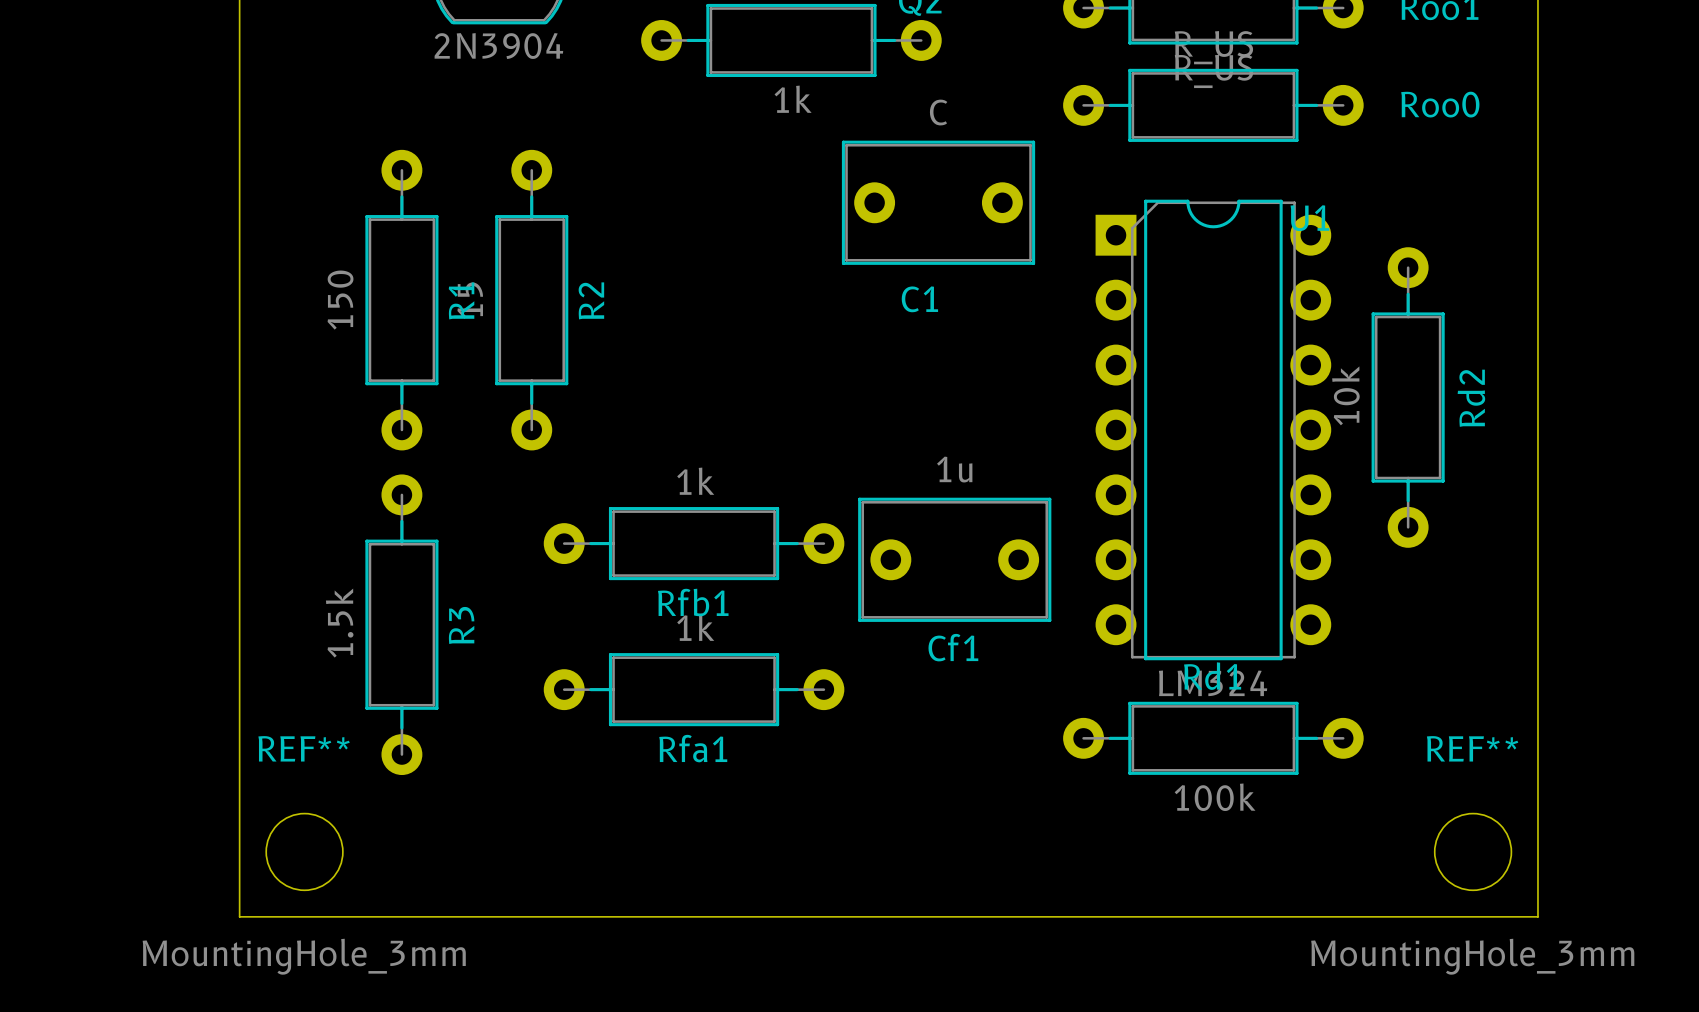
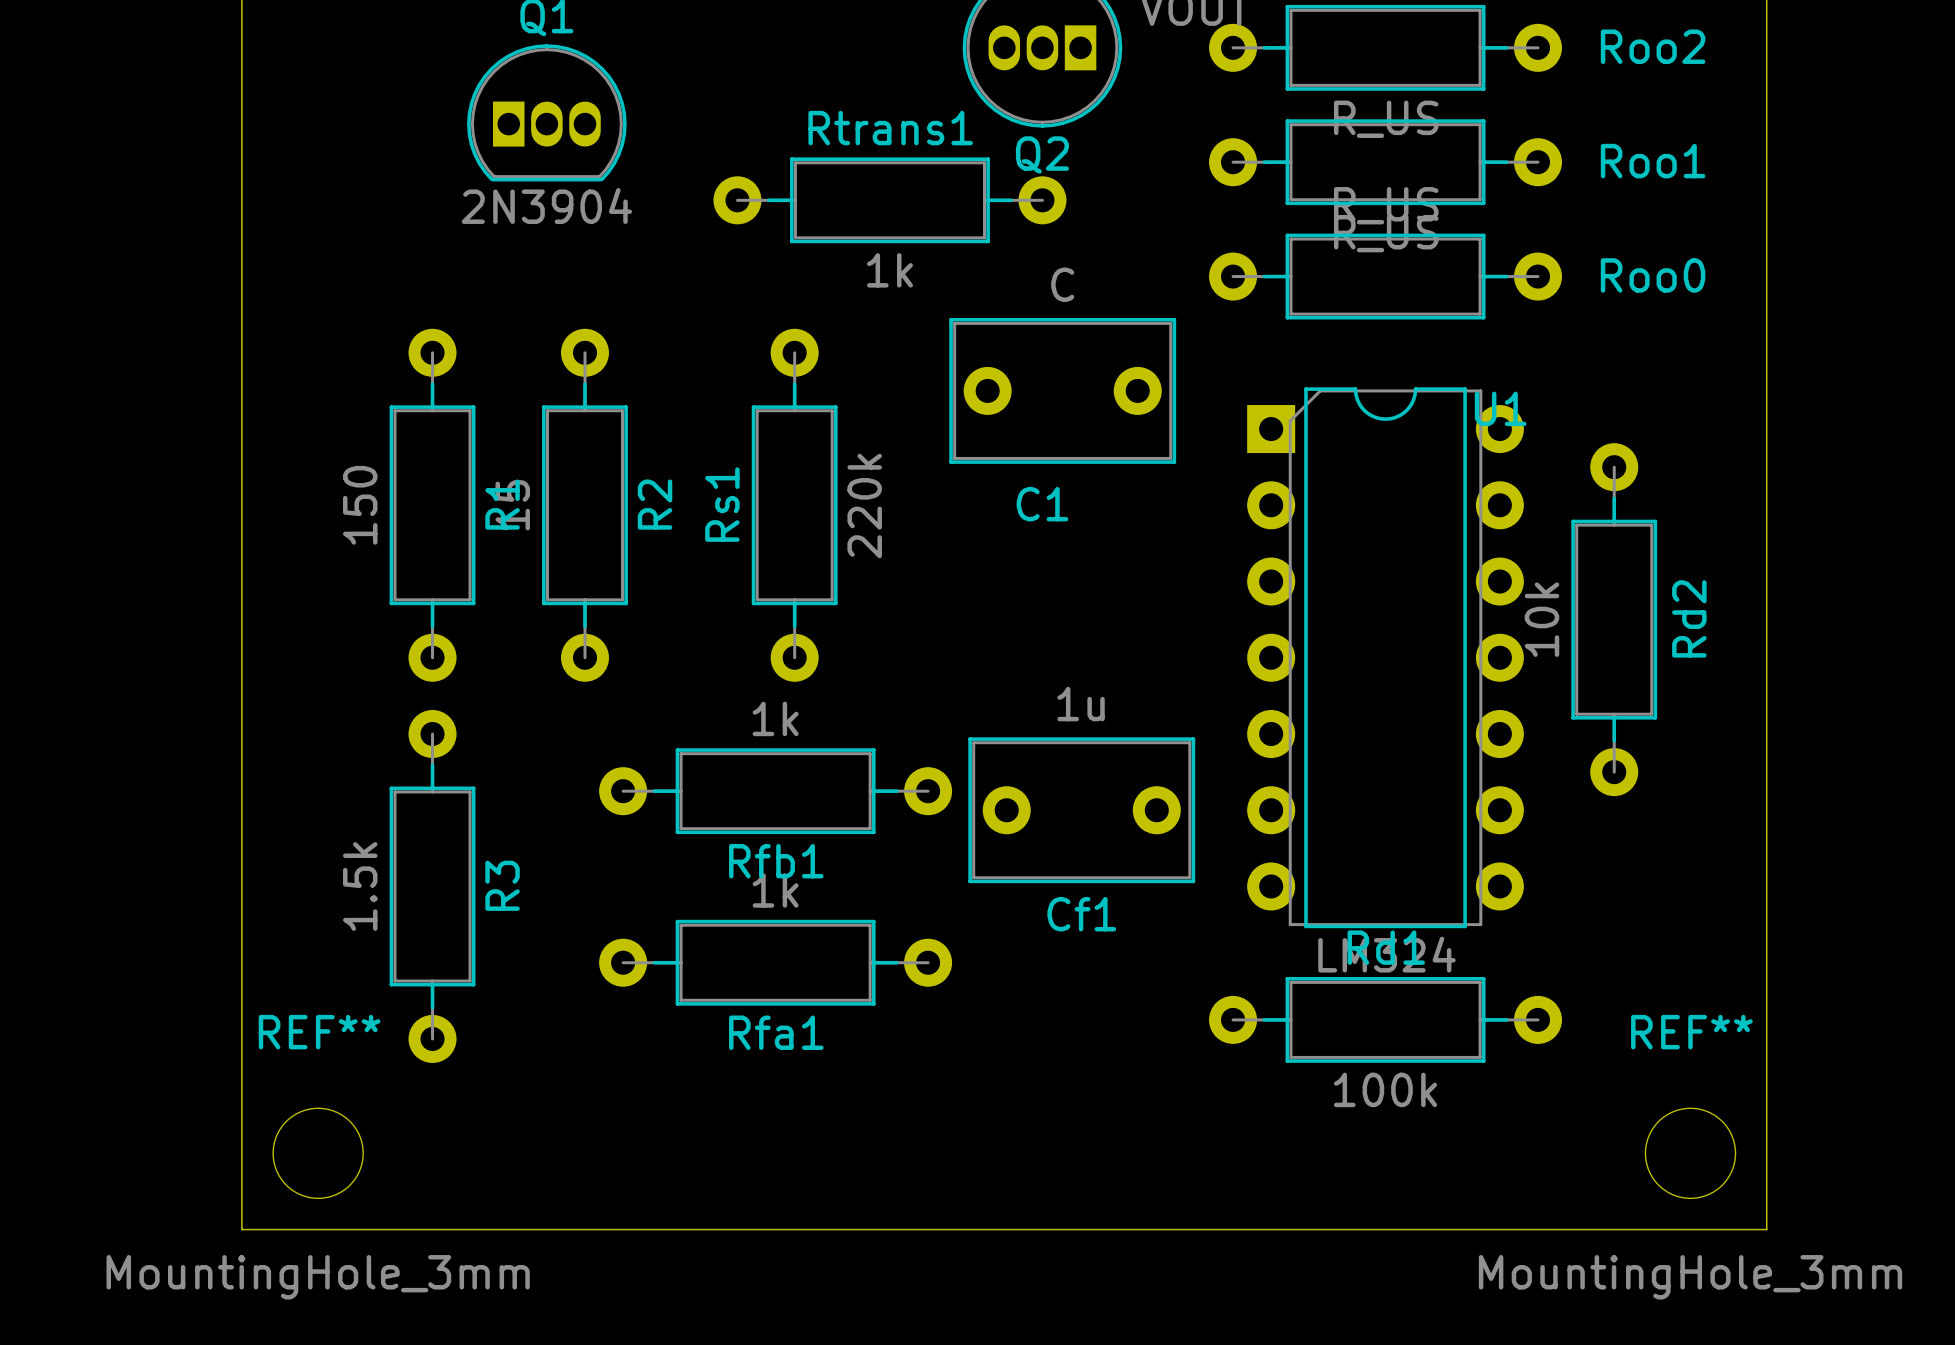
Rs1: none -> 220k (794, 505)

